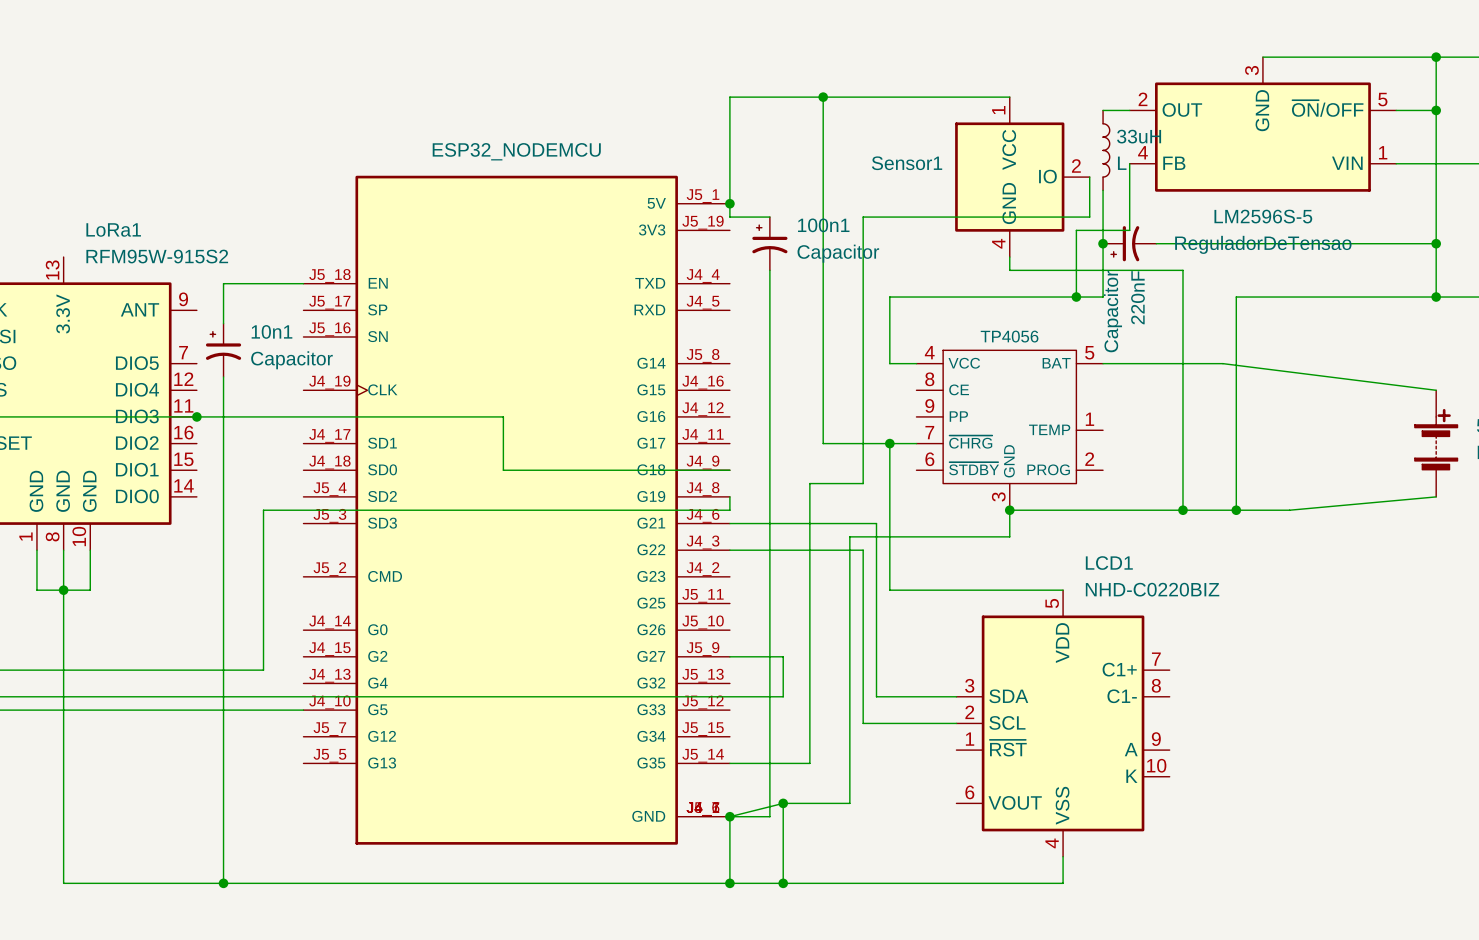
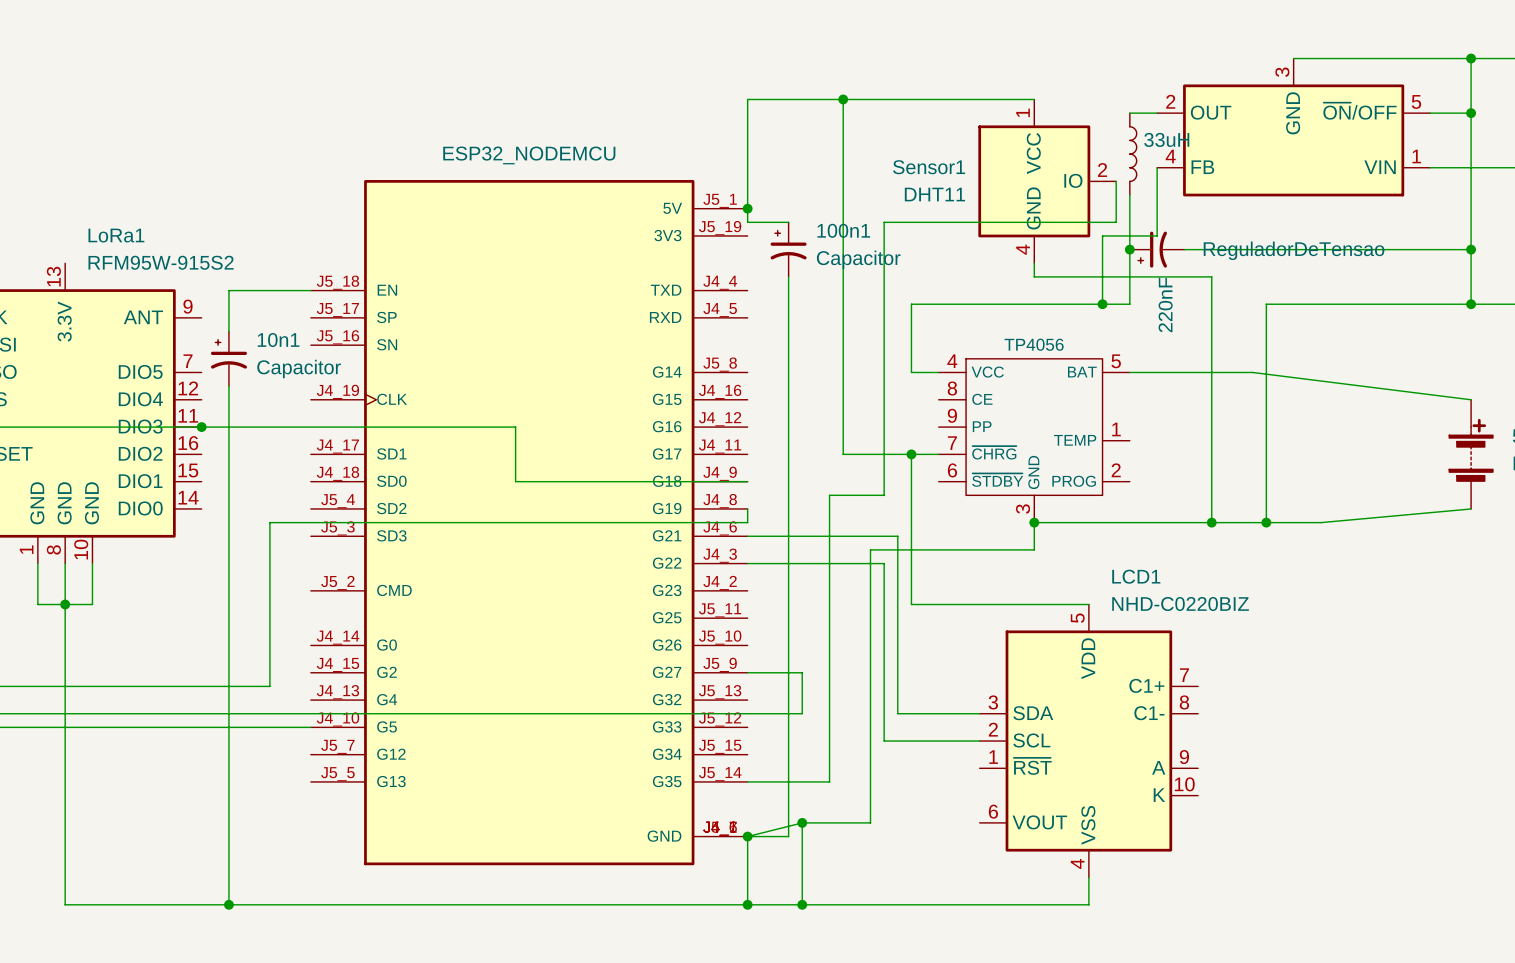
33uH value: L (1122, 163) -> none
Sensor1 value: none -> DHT11 (934, 194)
ReguladorDeTensao value: LM2596S-5 (1263, 216) -> none
220nF value: Capacitor (1112, 311) -> none

